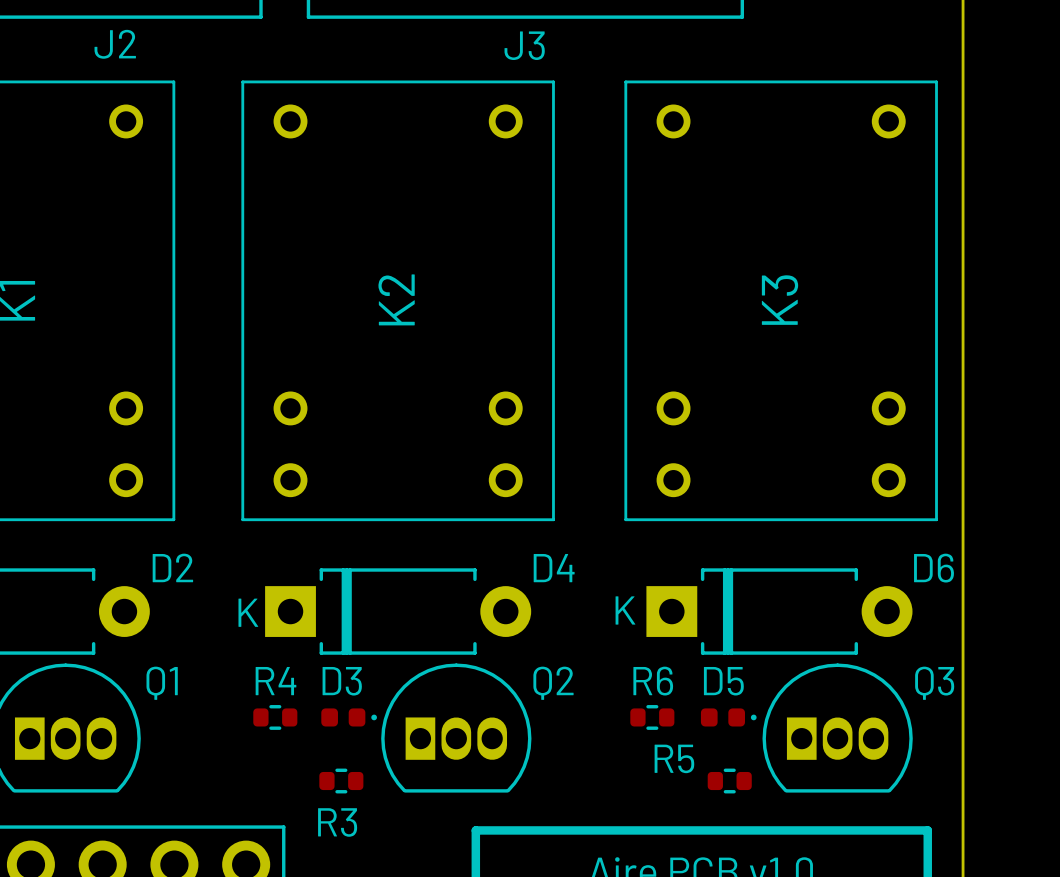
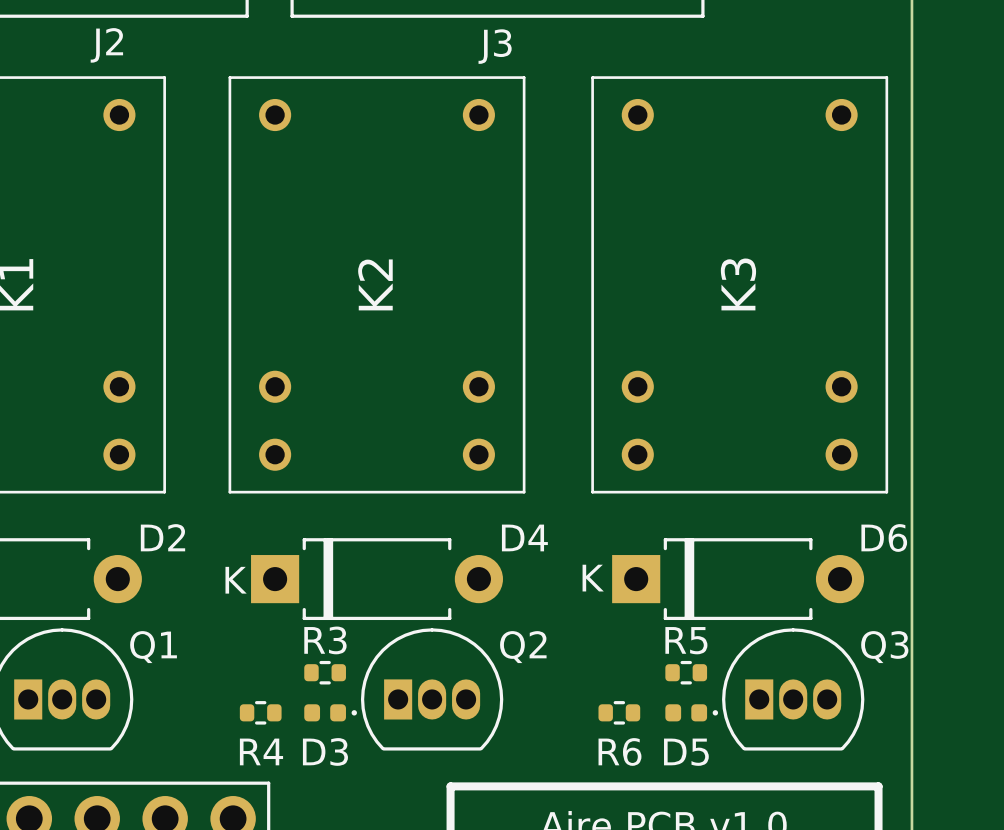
R4 name position: R4 (275, 681) -> R4 (261, 751)
D3 name position: D3 (342, 681) -> D3 (325, 751)
R6 name position: R6 (653, 681) -> R6 (619, 751)
D5 name position: D5 (723, 681) -> D5 (686, 752)
R4 position: (275, 717) -> (260, 712)
D3 position: (349, 717) -> (330, 712)
R6 position: (652, 717) -> (619, 712)
D5 position: (728, 717) -> (691, 712)
R5 name position: R5 (674, 758) -> R5 (686, 640)
R3 position: (341, 781) -> (325, 672)
R5 position: (729, 781) -> (686, 672)
R3 name position: R3 (337, 822) -> R3 (325, 640)

